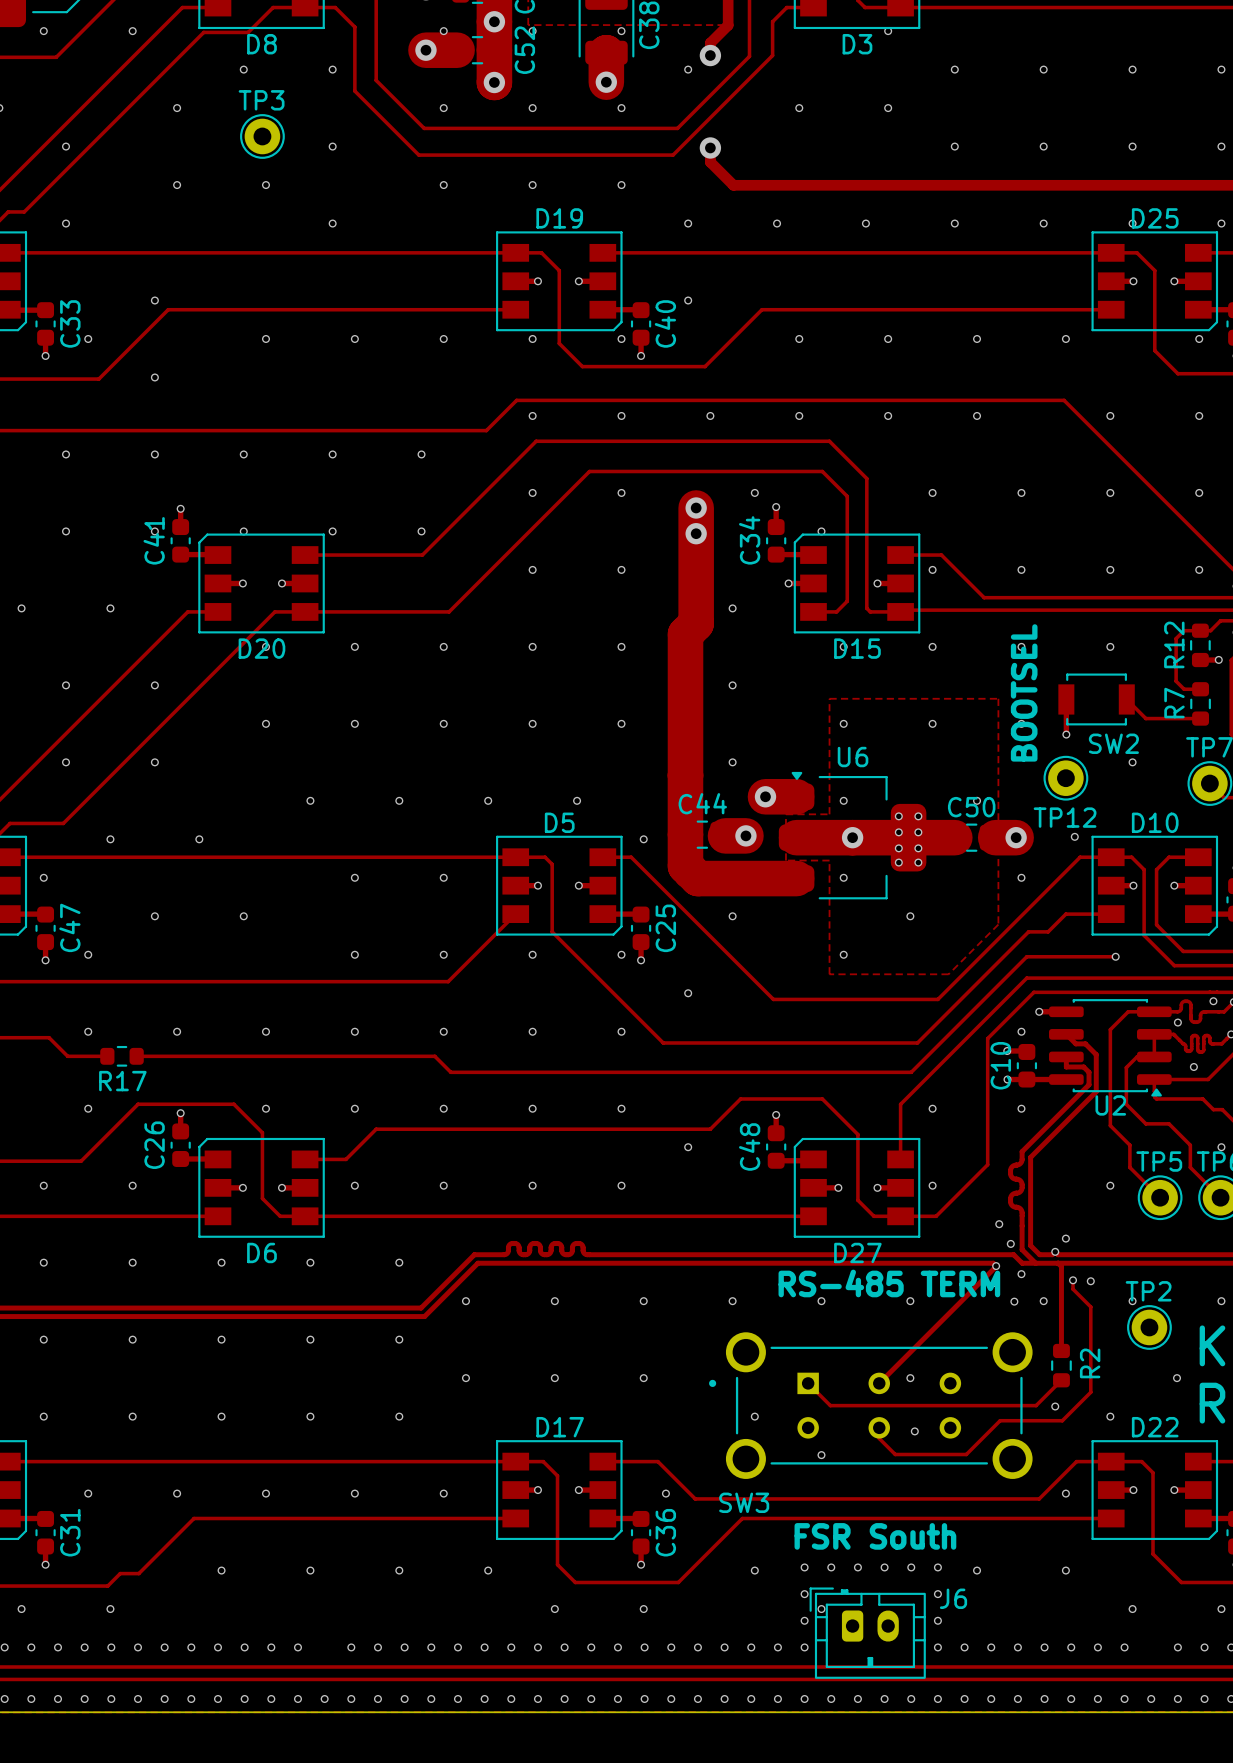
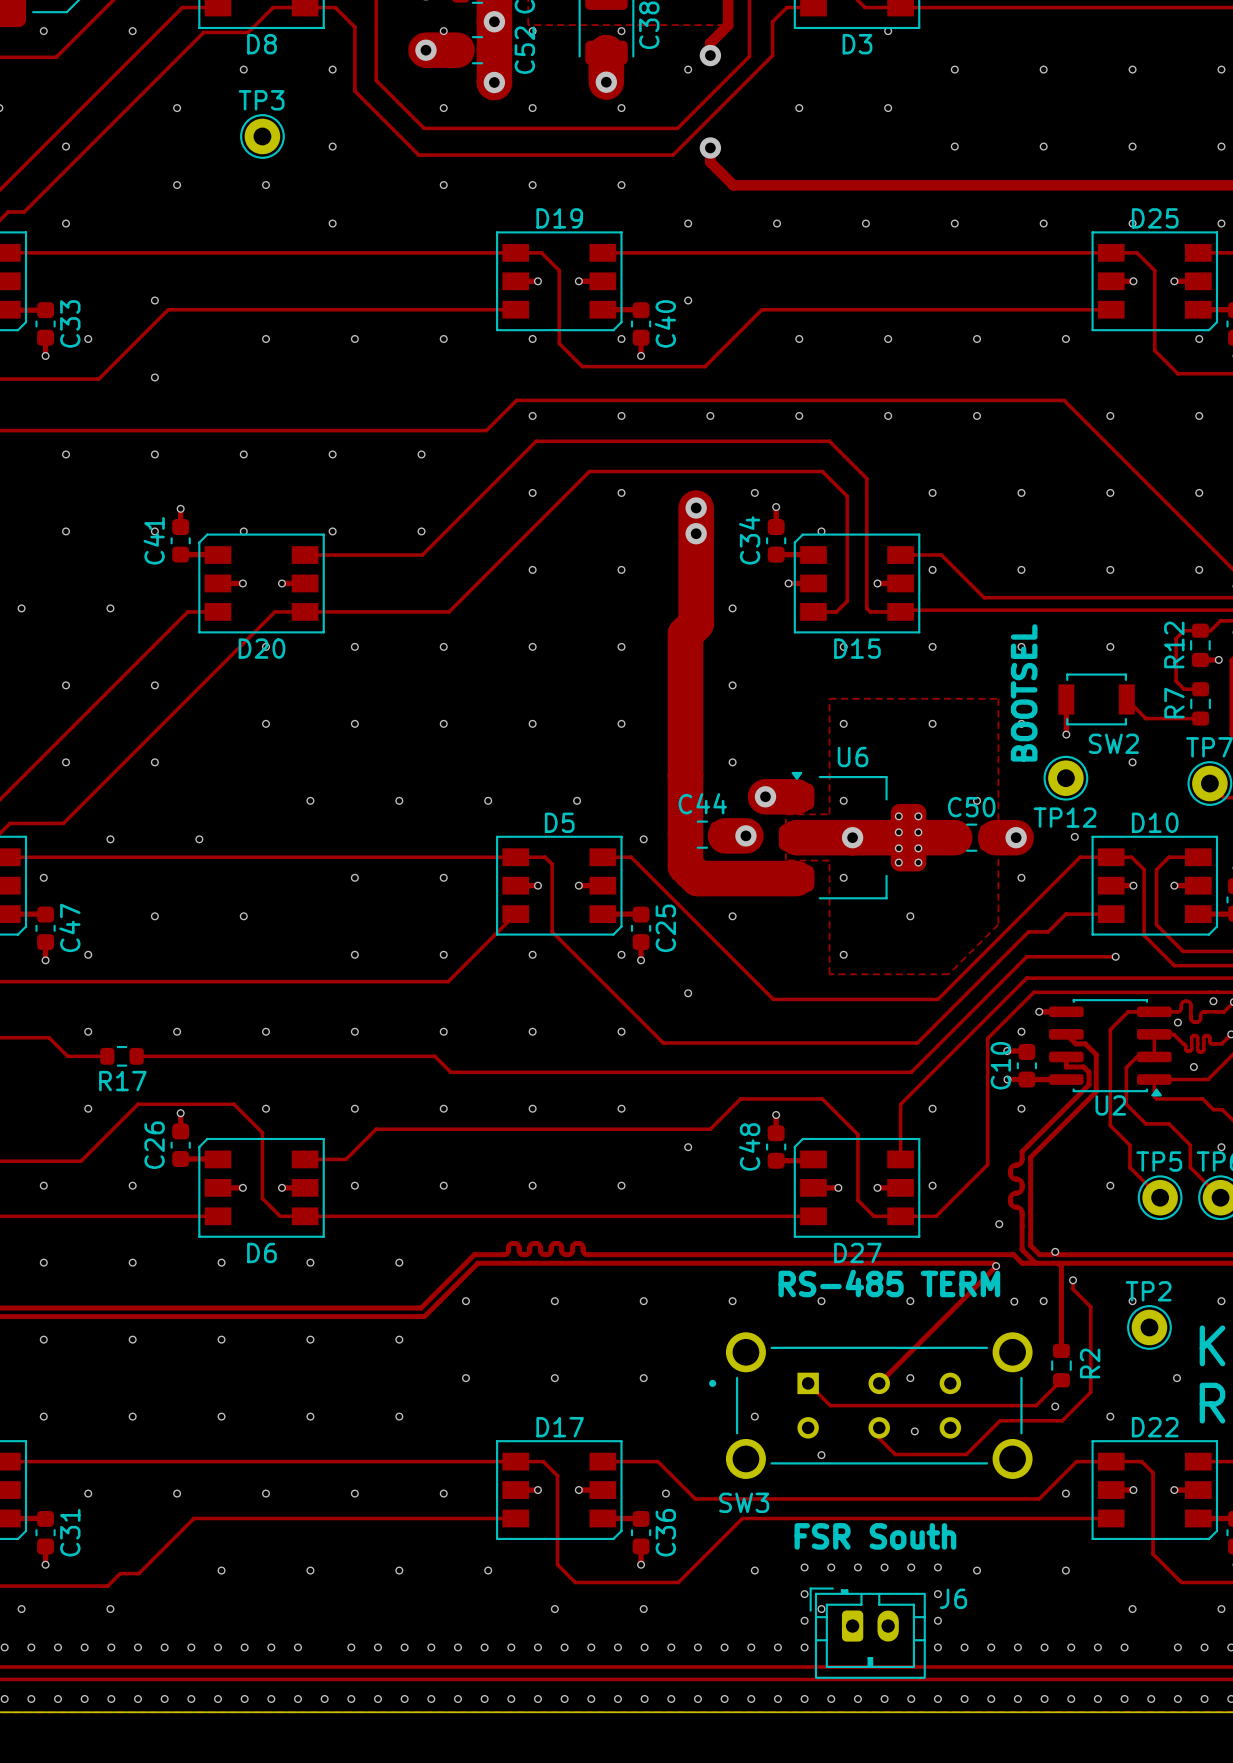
via: (1065, 1238) -> none
via: (1010, 1243) -> none
via: (1021, 1274) -> none
via: (1090, 1281) -> none

